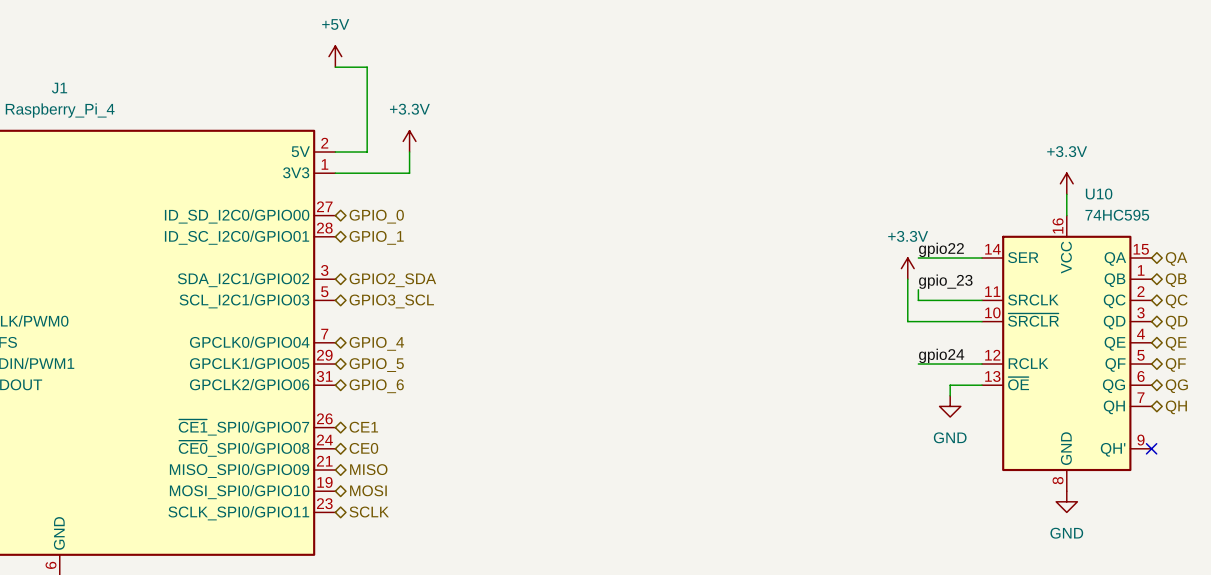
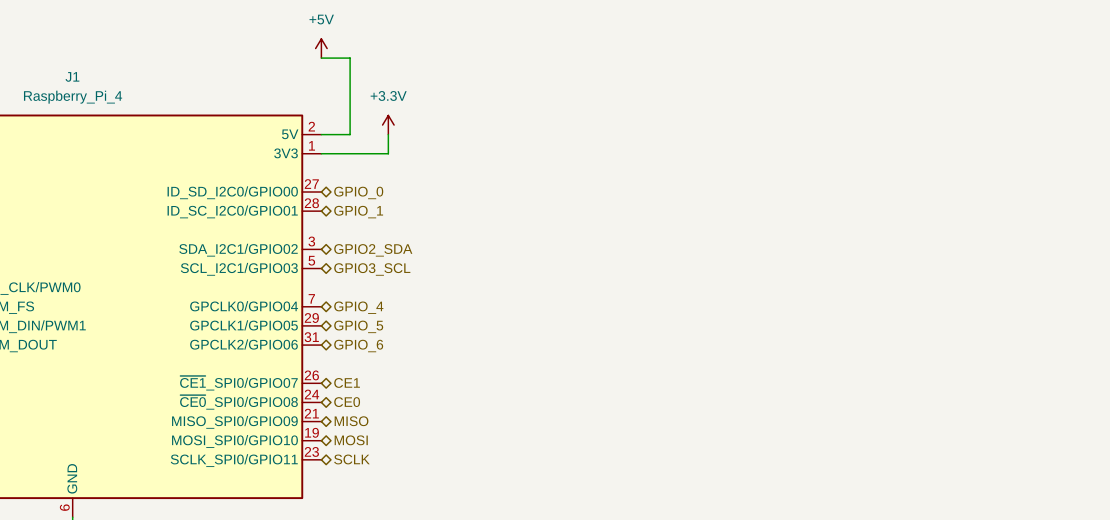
power symbol: +3.3V (1066, 183) -> none
wire: (1066, 194) (1066, 215) -> none
label: gpio22 (941, 249) -> none
wire: (918, 258) (981, 258) -> none
hierarchical label: QA (1176, 258) -> none
power symbol: +3.3V (907, 268) -> none
wire: (907, 279) (907, 321) (981, 321) -> none
hierarchical label: QB (1176, 280) -> none
label: gpio_23 (945, 281) -> none
wire: (918, 289) (918, 300) (981, 300) -> none
hierarchical label: QC (1176, 301) -> none
hierarchical label: QD (1176, 322) -> none
hierarchical label: QE (1176, 343) -> none
U10: 74HC595 (1066, 353) -> none
label: gpio24 (941, 355) -> none
wire: (918, 364) (981, 364) -> none
hierarchical label: QF (1175, 364) -> none
wire: (981, 385) (950, 385) (950, 395) -> none
hierarchical label: QG (1176, 386) -> none
power symbol: GND (950, 406) -> none
hierarchical label: QH (1176, 407) -> none
no-connect mark: (1151, 448) -> none
power symbol: GND (1066, 501) -> none

